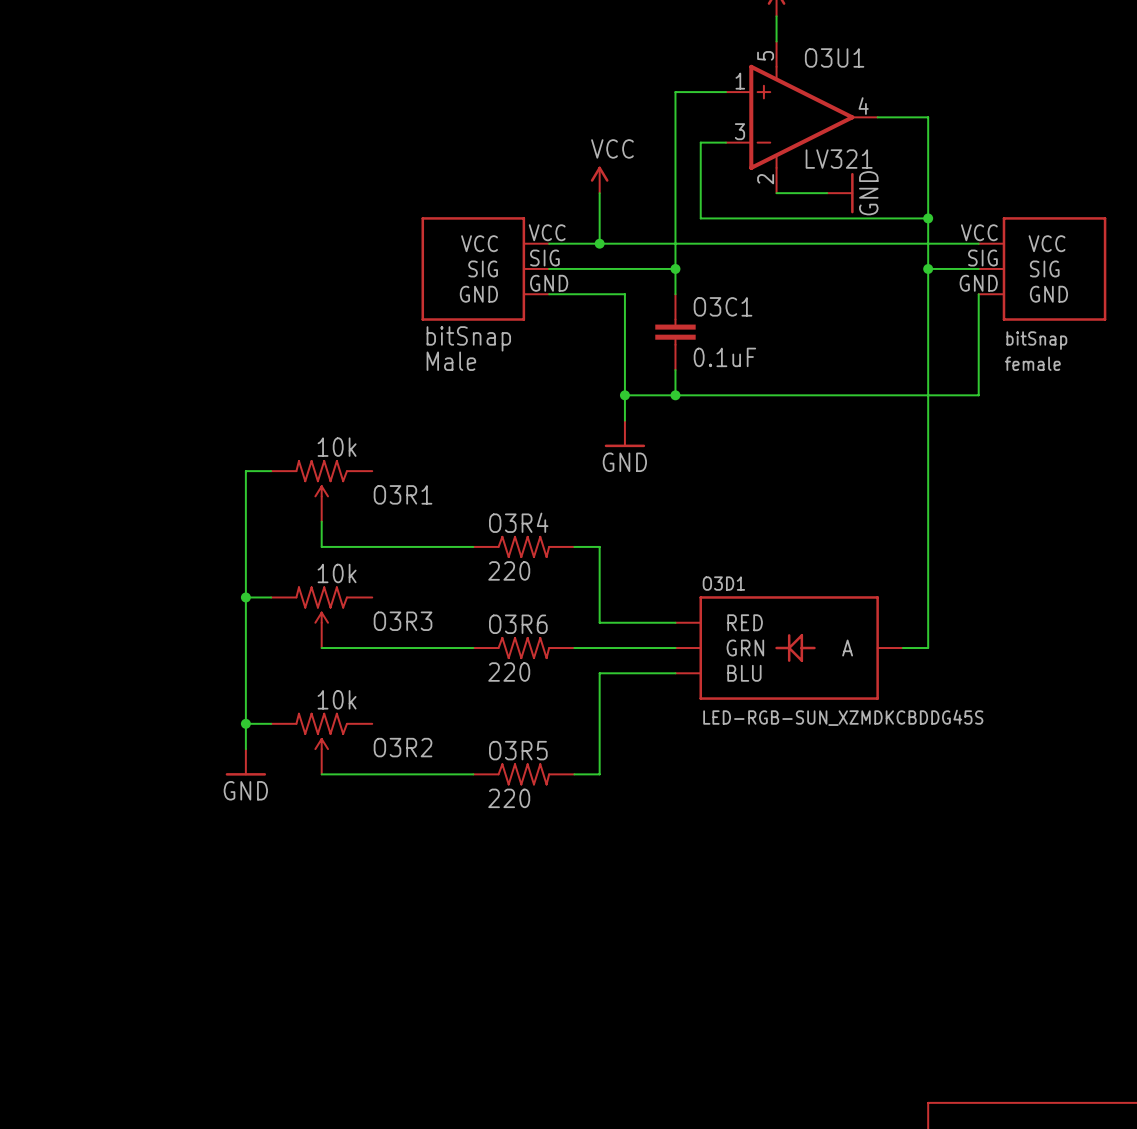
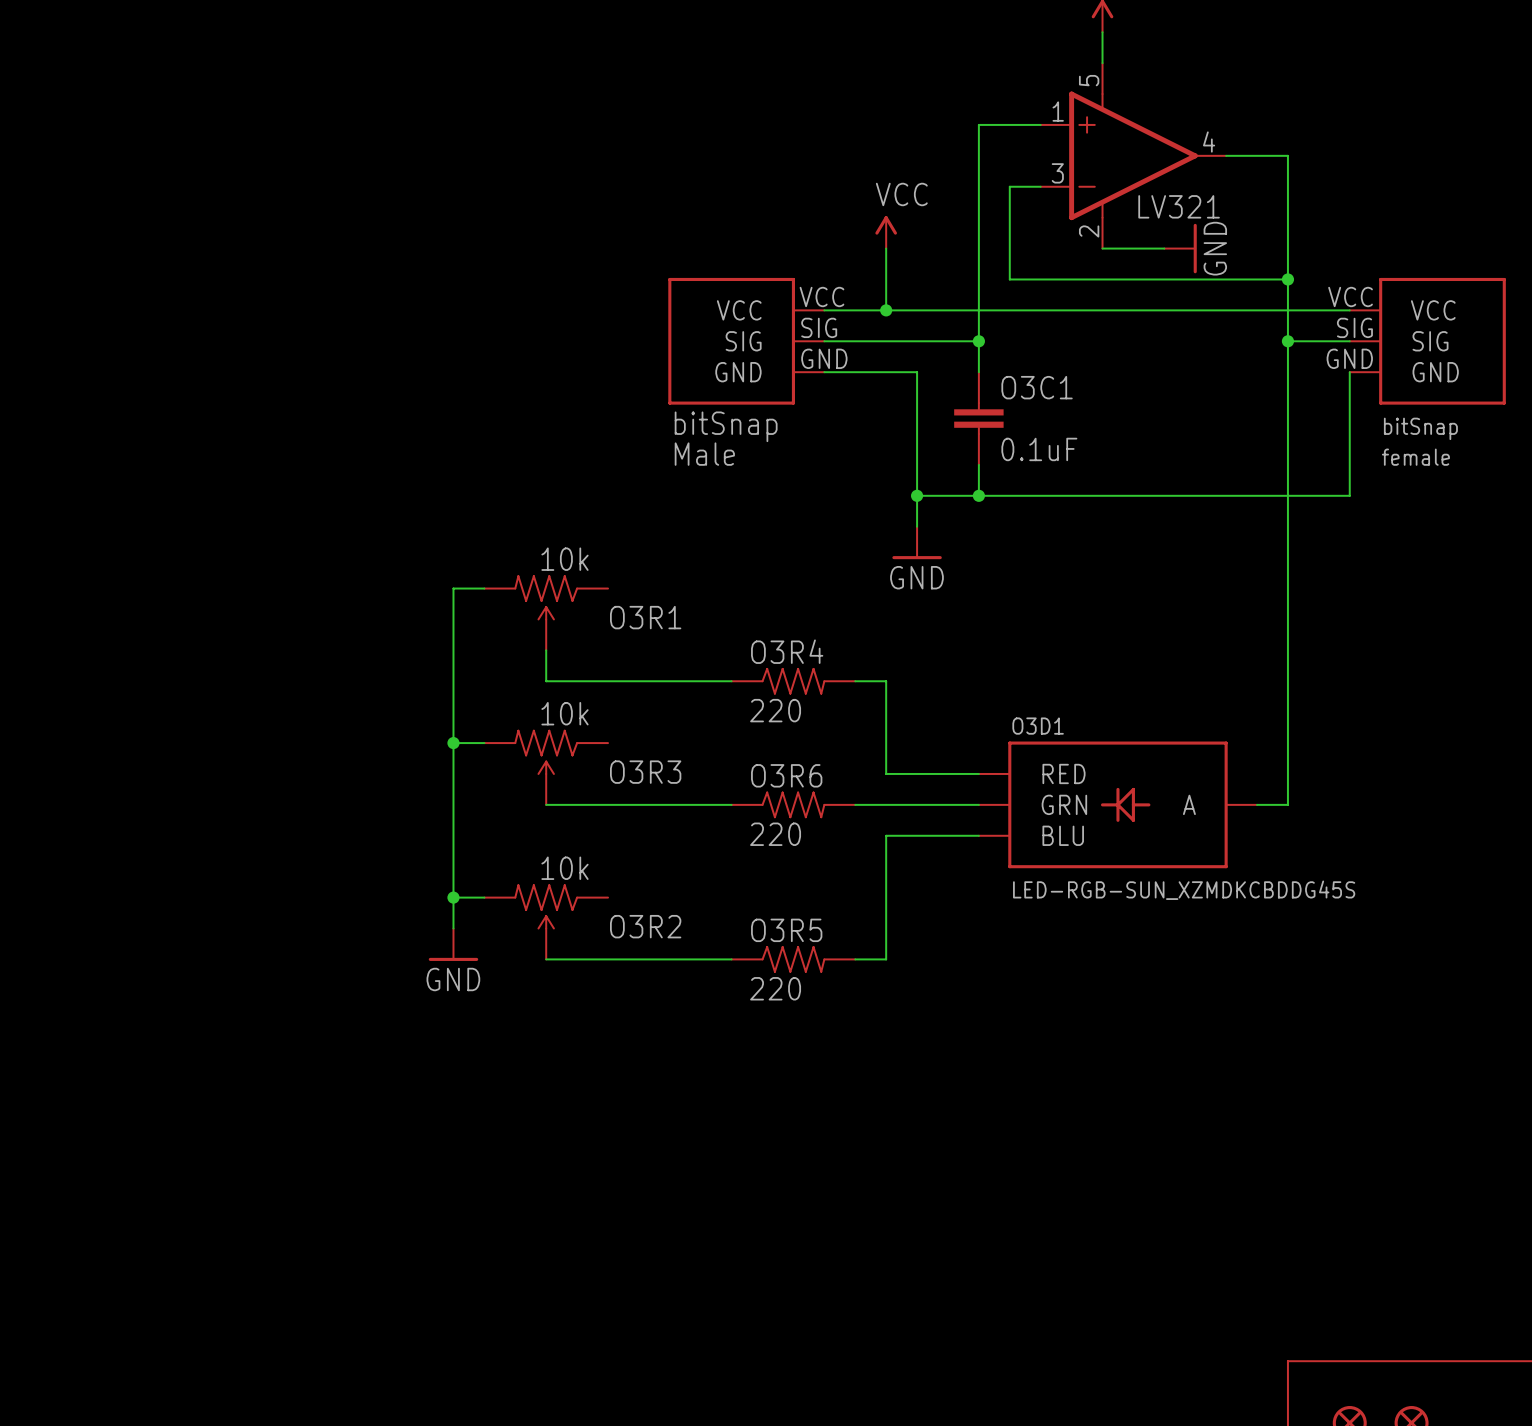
O3U1 name: O3U1 (834, 57) -> none

